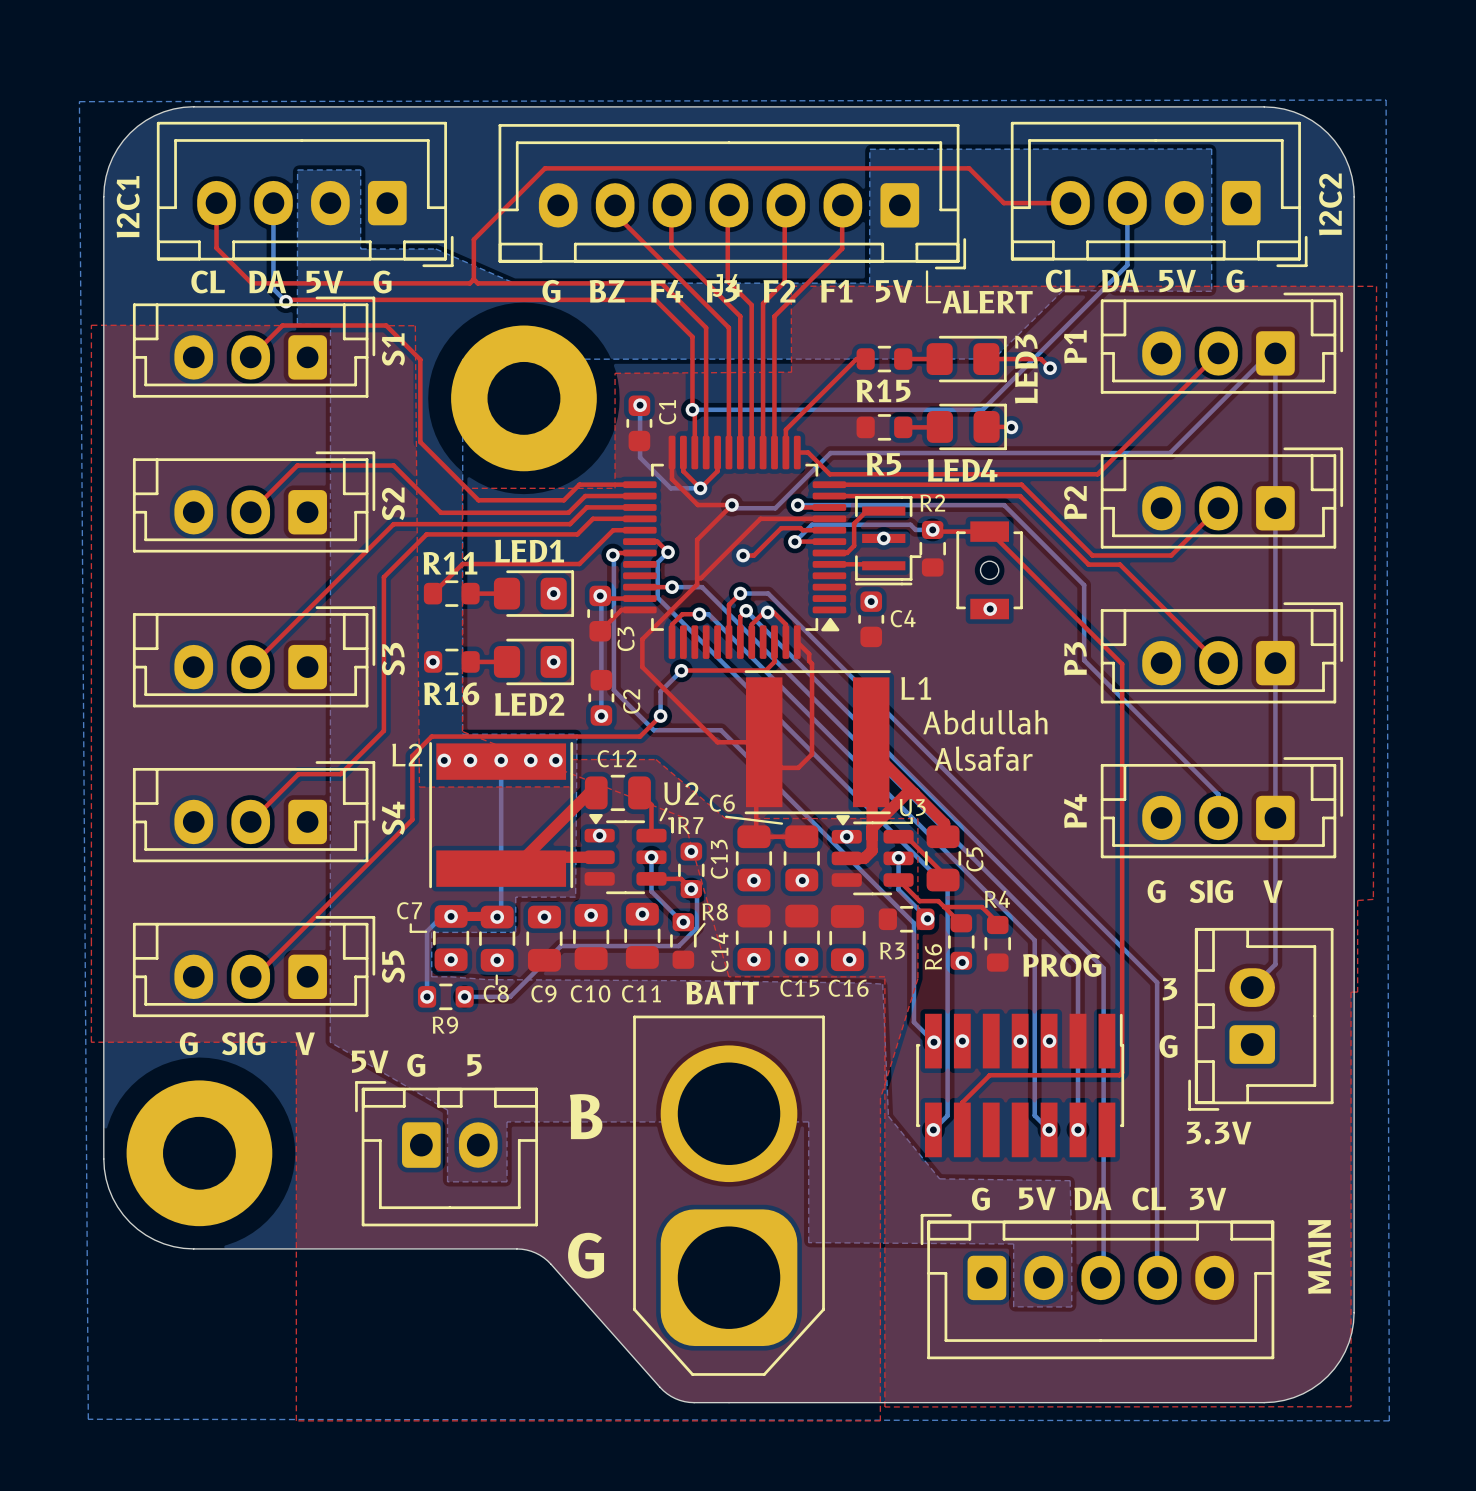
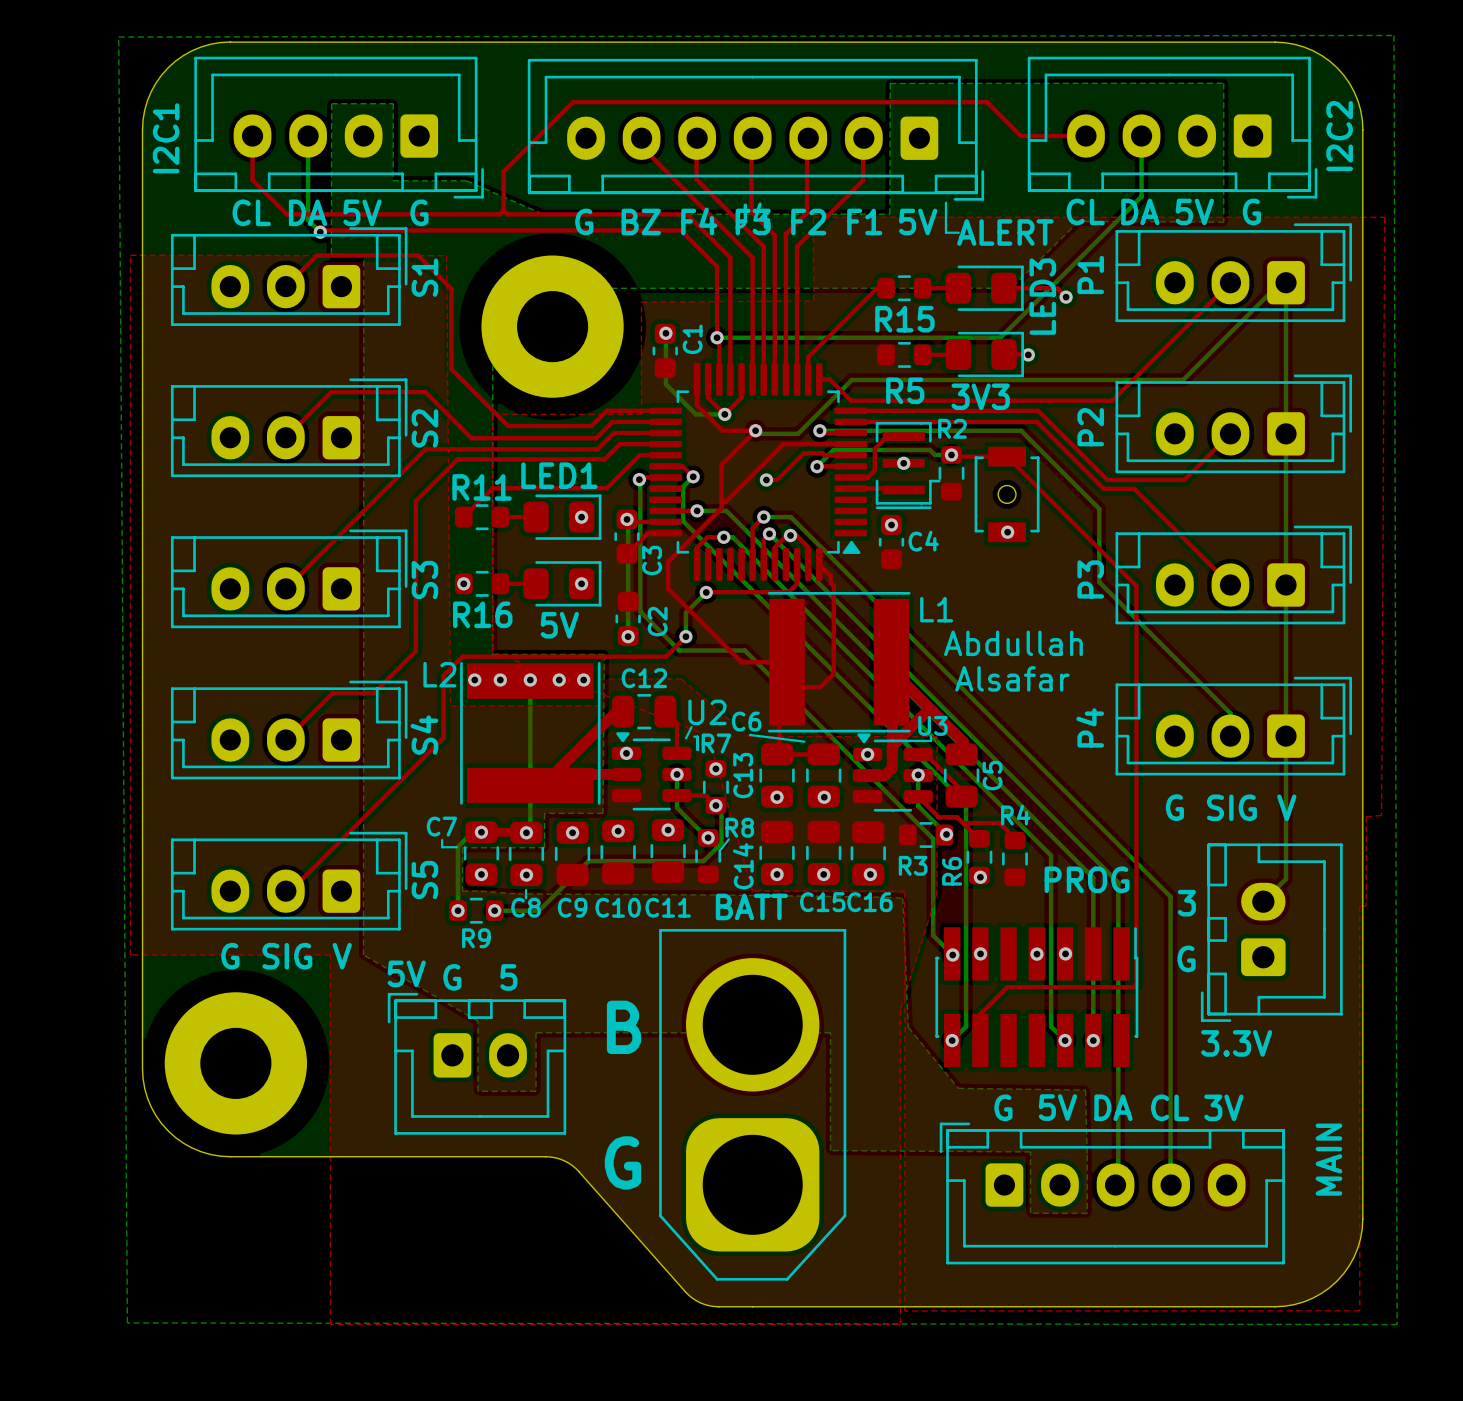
LED4 name: LED4 (962, 470) -> 3V3 (980, 396)
LED2 name: LED2 (529, 704) -> 5V (559, 625)

